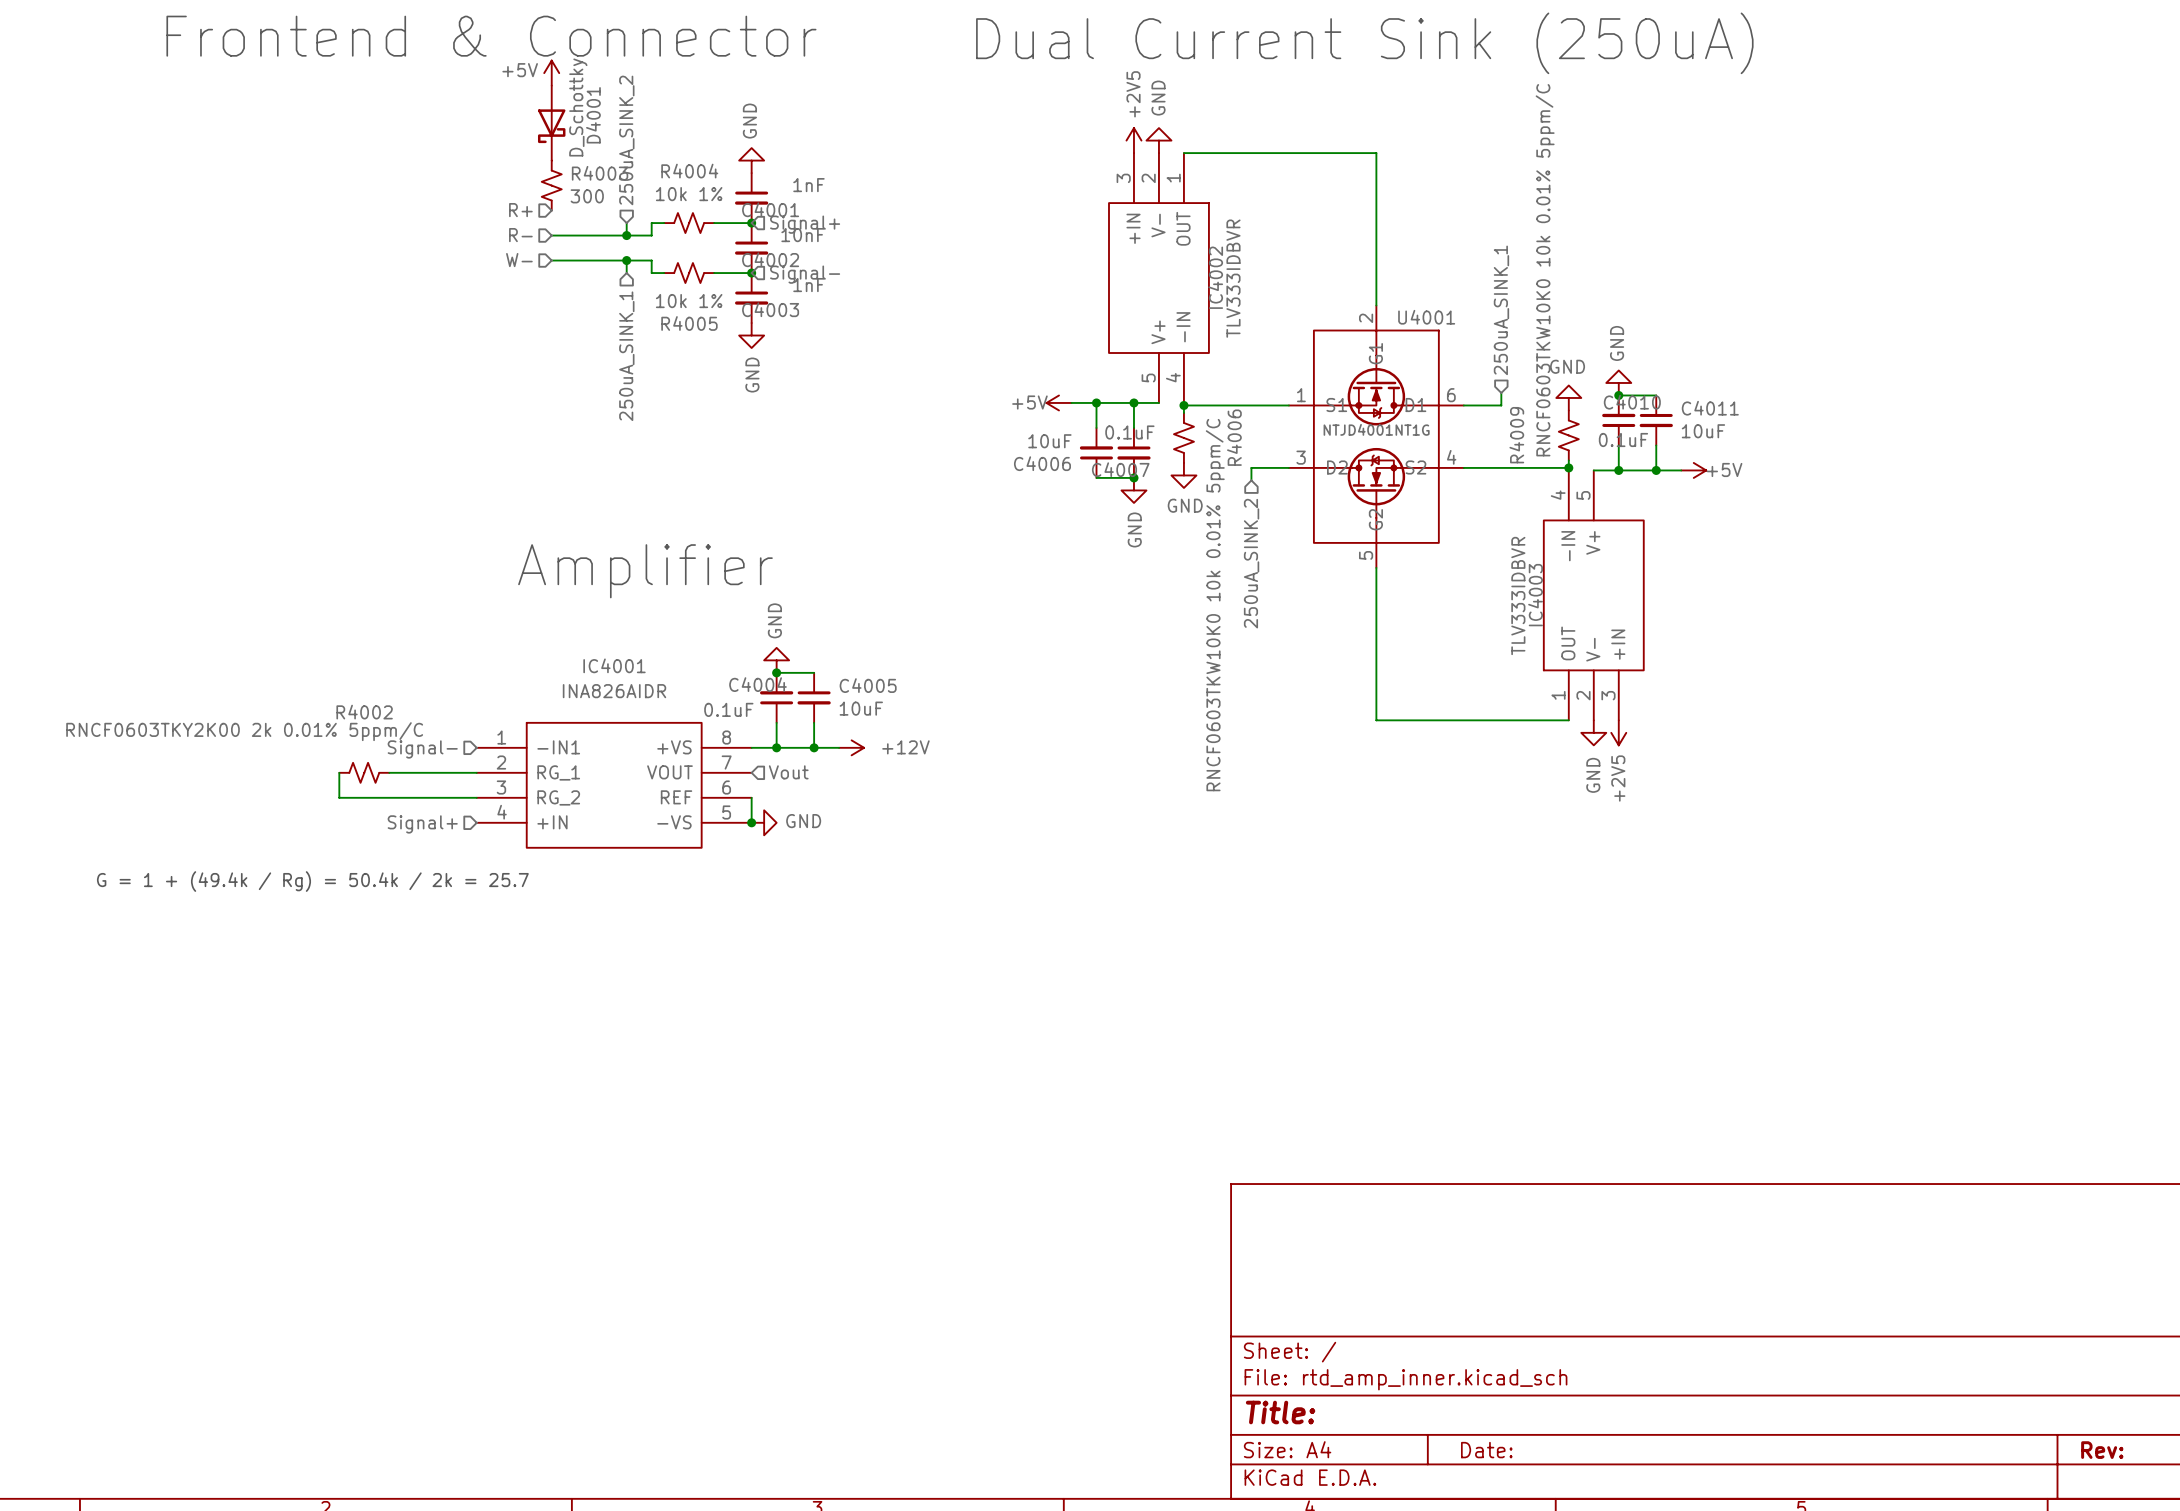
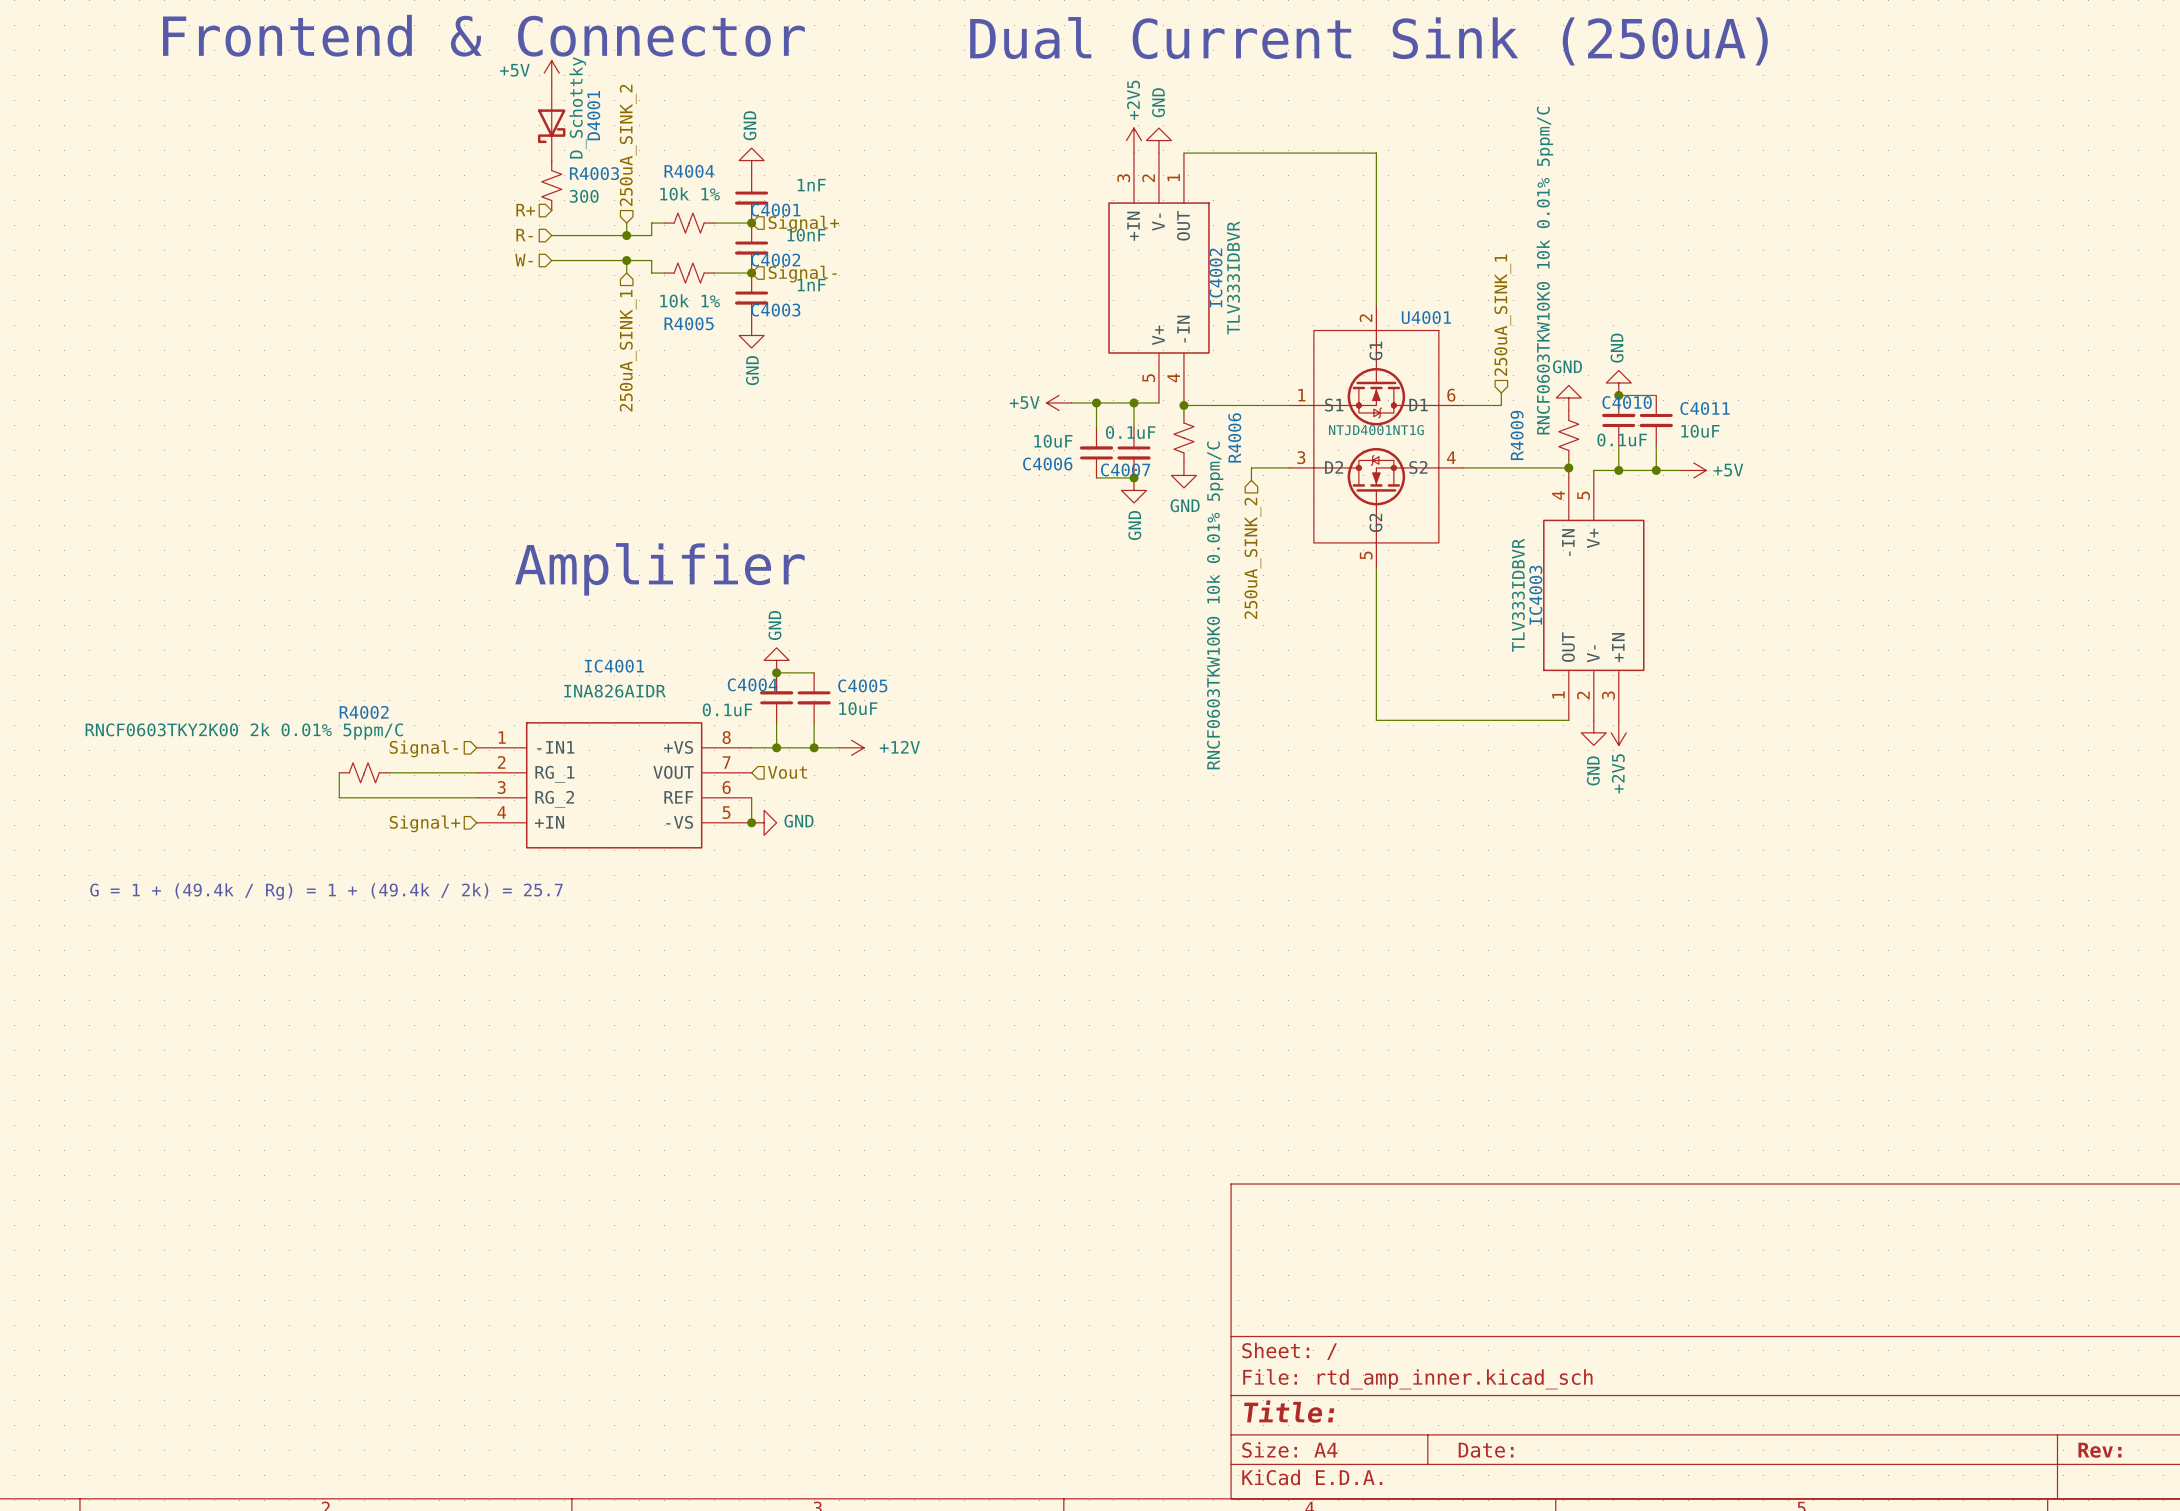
text: G = 1 + (49.4k / Rg) = 50.4k / 2k = 25.7 (312, 881) -> G = 1 + (49.4k / Rg) = 1 + (49.4k / 2k) = 25.7 (326, 891)

